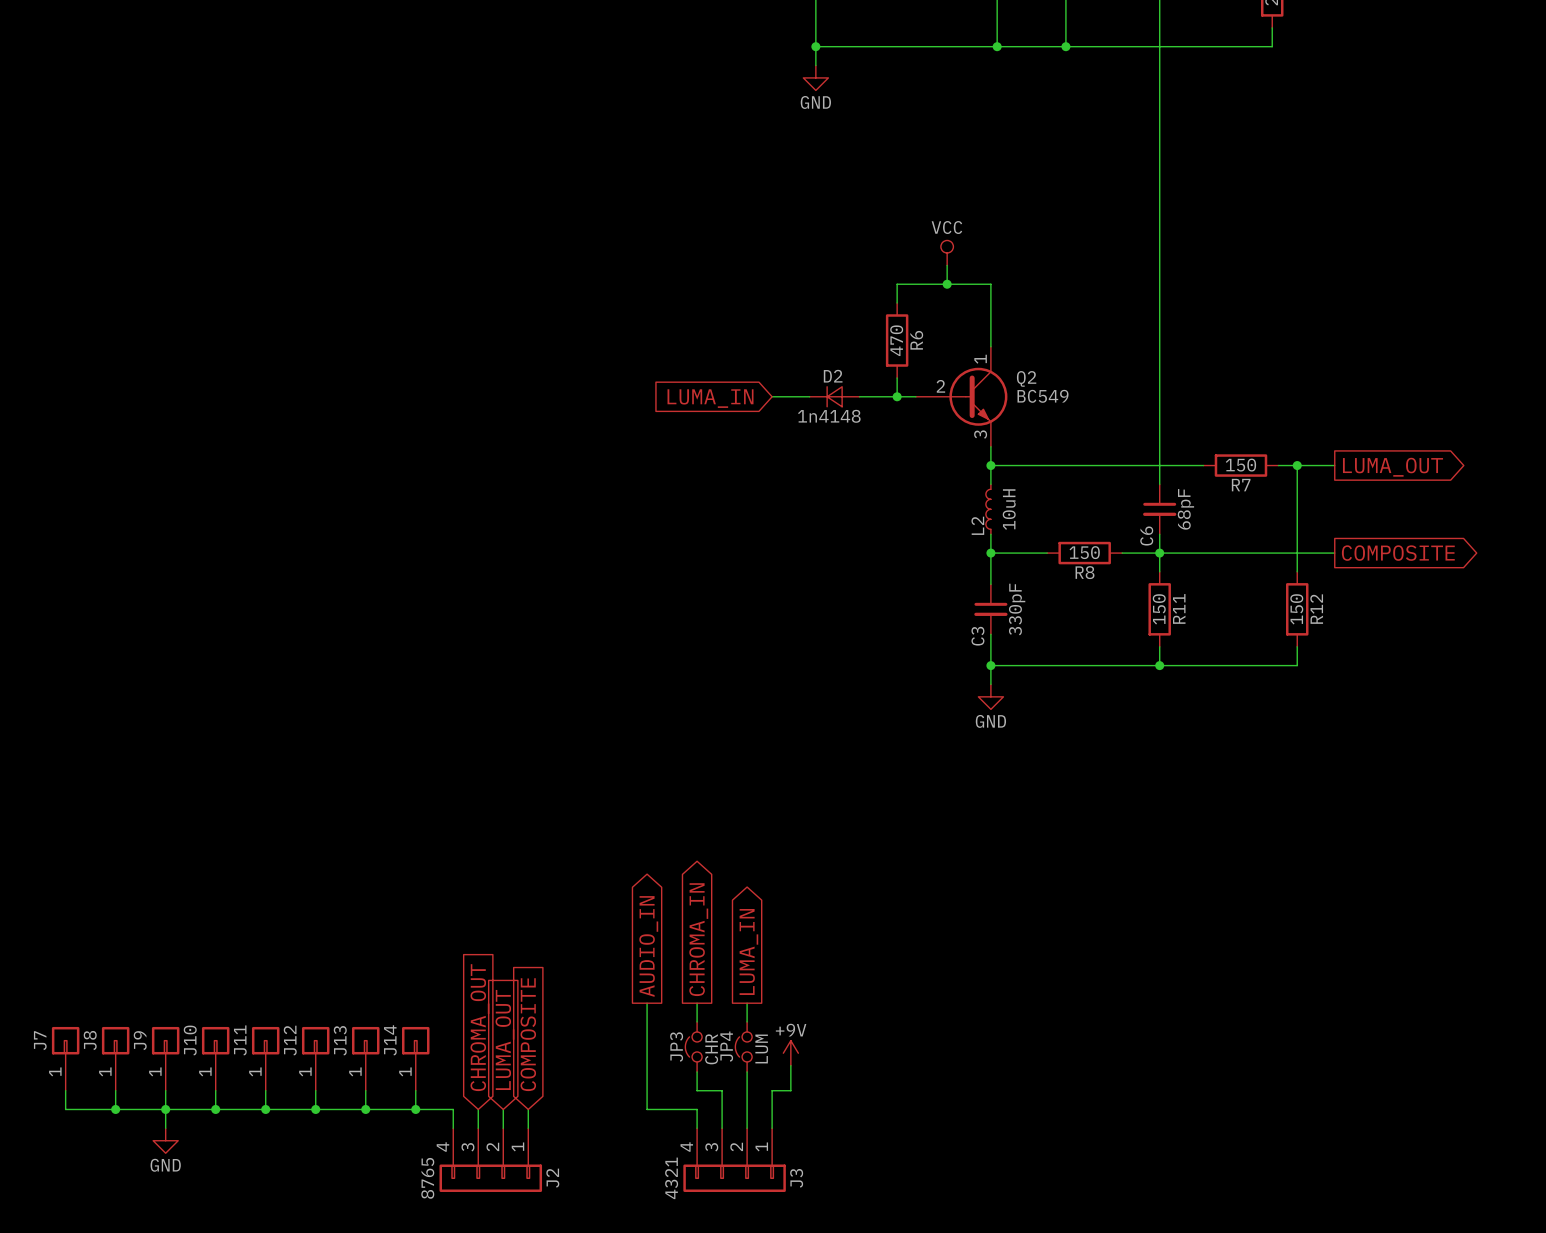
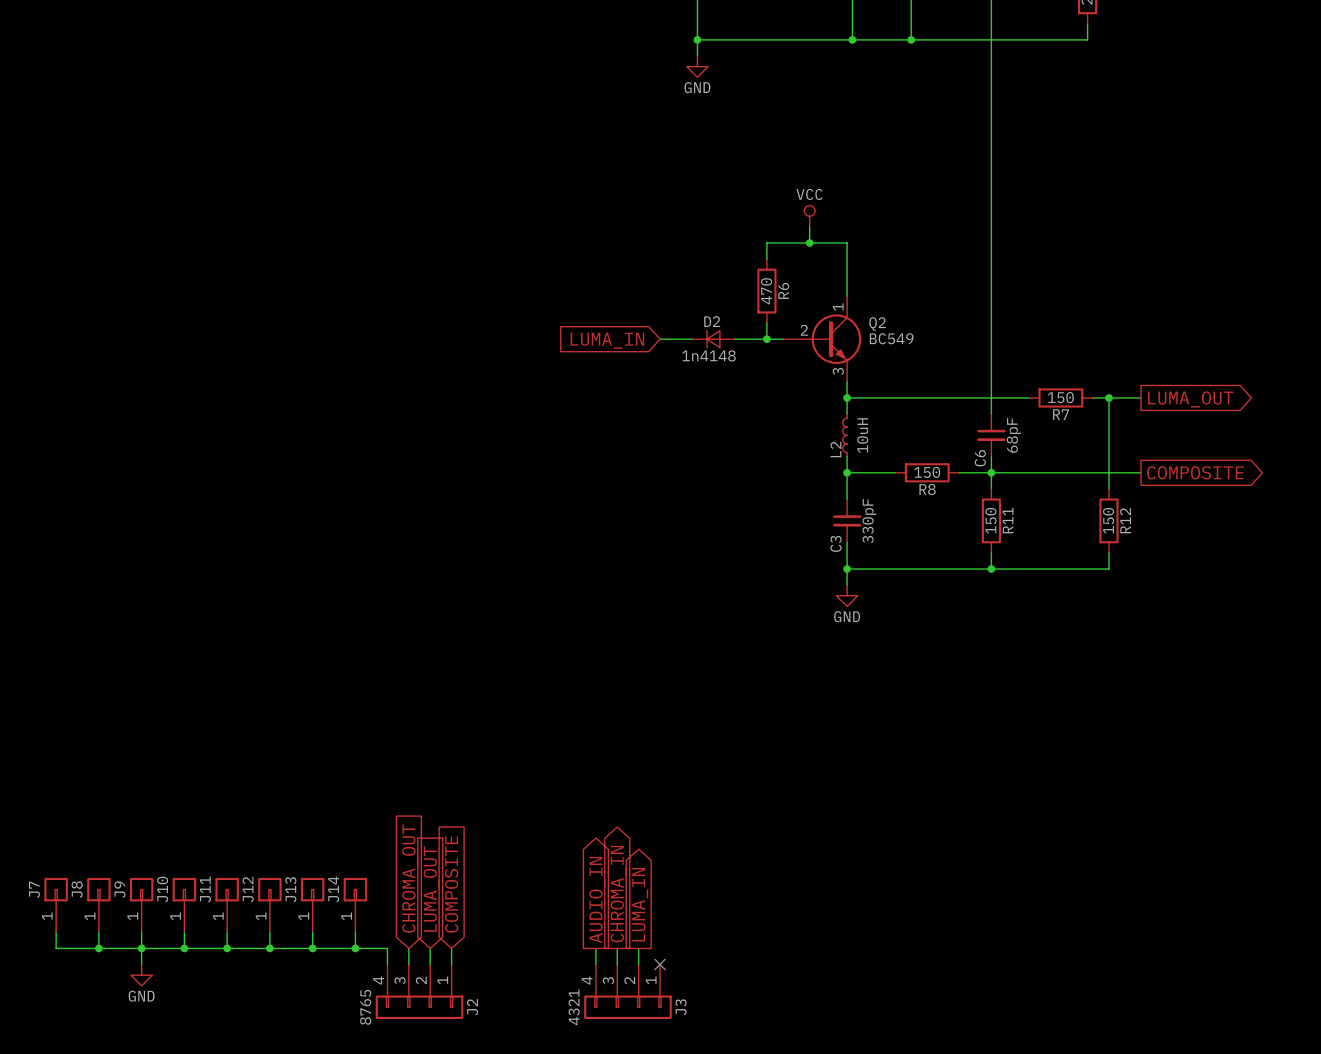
global label position: CHROMA_IN (698, 939) -> CHROMA_IN (618, 894)
global label position: AUDIO_IN (648, 946) -> AUDIO_IN (597, 899)
global label position: LUMA_IN (748, 951) -> LUMA_IN (640, 904)
wire: (647, 1003) (647, 1109) (697, 1109) -> none
wire: (697, 1003) (697, 1021) -> none
wire: (747, 1003) (747, 1021) -> none
JP3: CHR (693, 1046) -> none
JP4: LUM (743, 1046) -> none
power symbol: +9V (790, 1053) -> none
wire: (790, 1065) (790, 1090) (772, 1090) (772, 1128) -> none
wire: (697, 1071) (697, 1090) (722, 1090) (722, 1109) -> none
wire: (747, 1071) (747, 1109) -> none
no-connect mark: none -> (660, 964)

